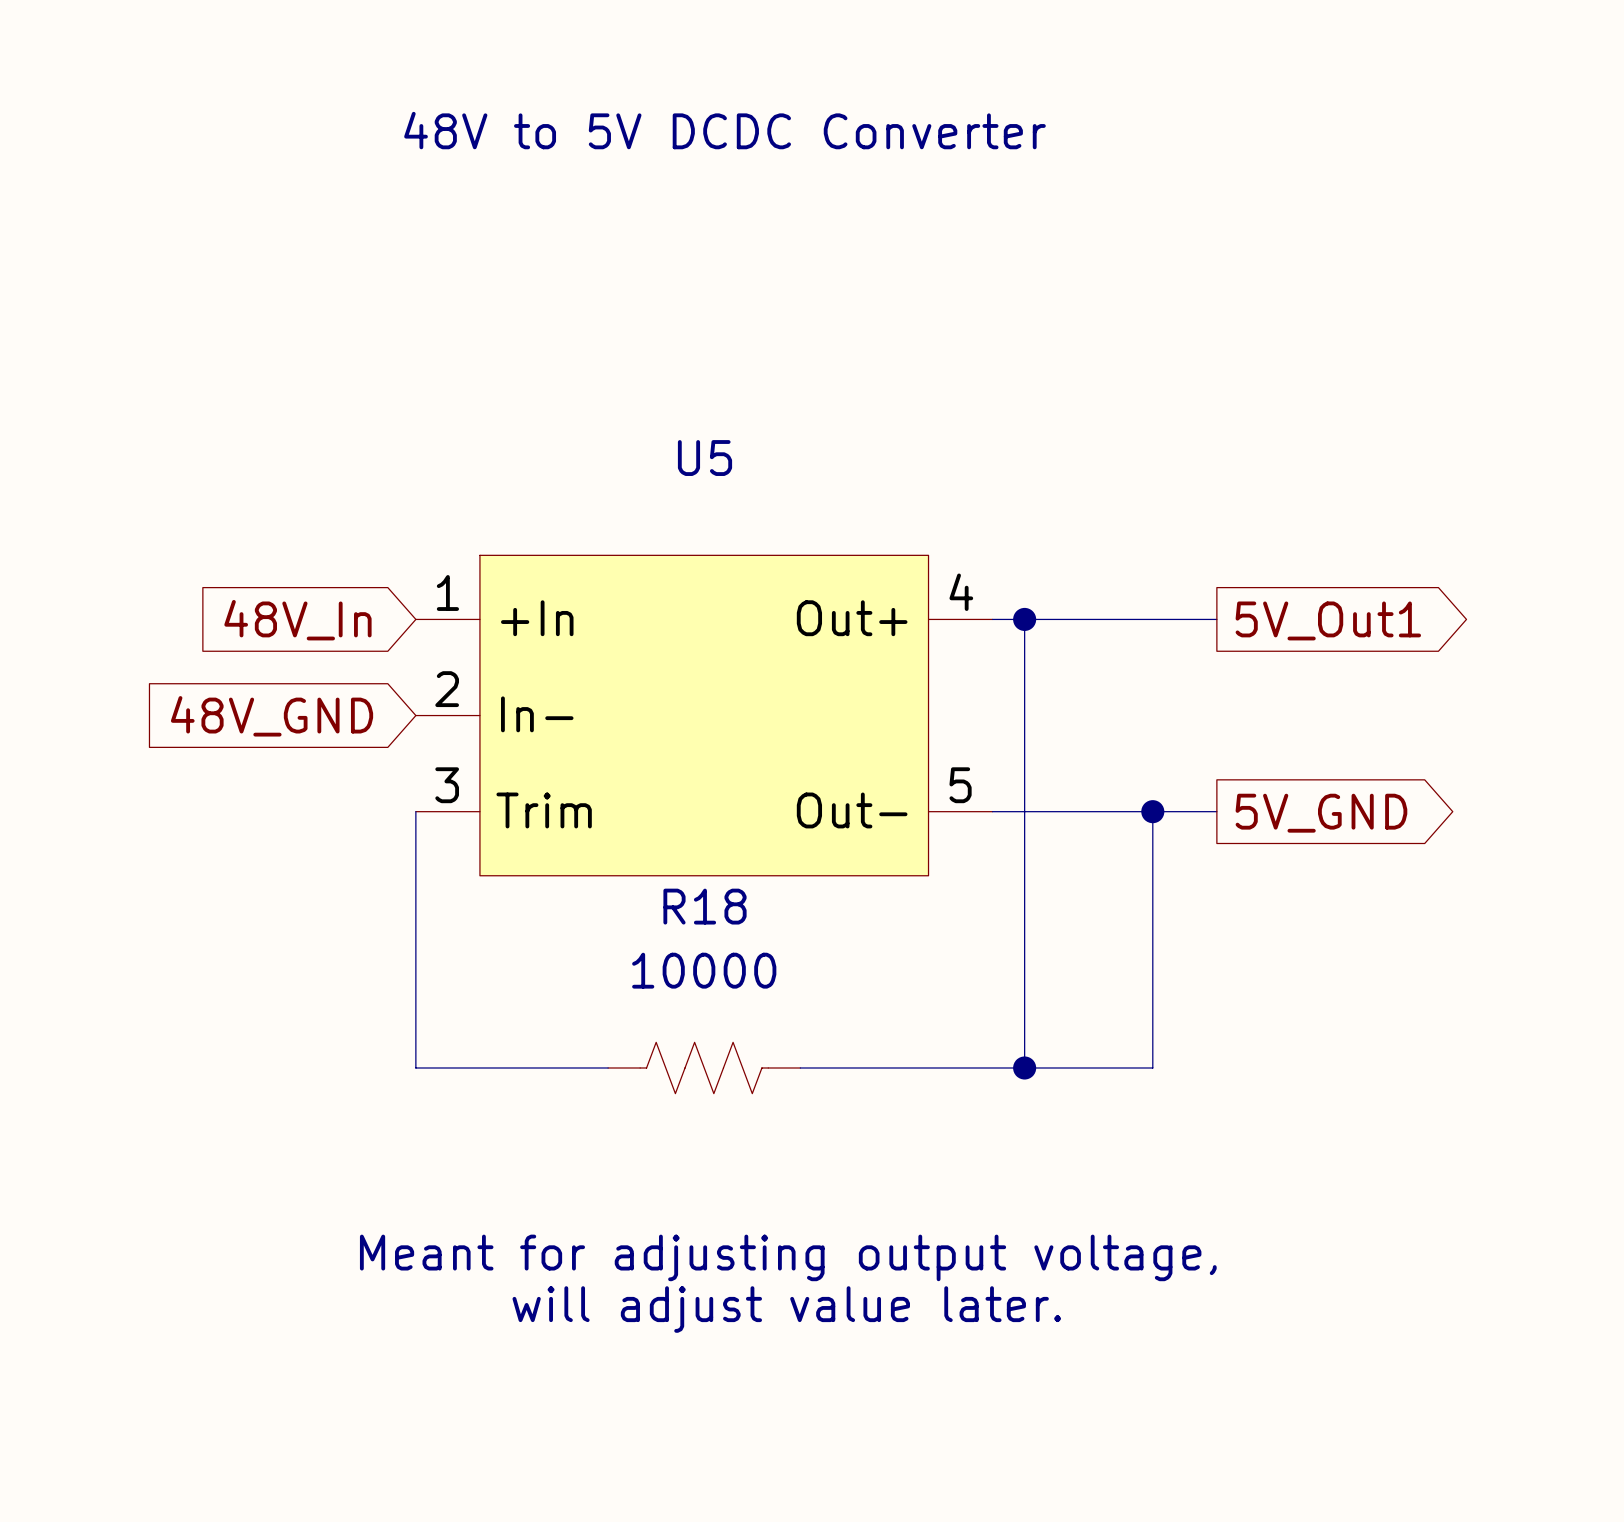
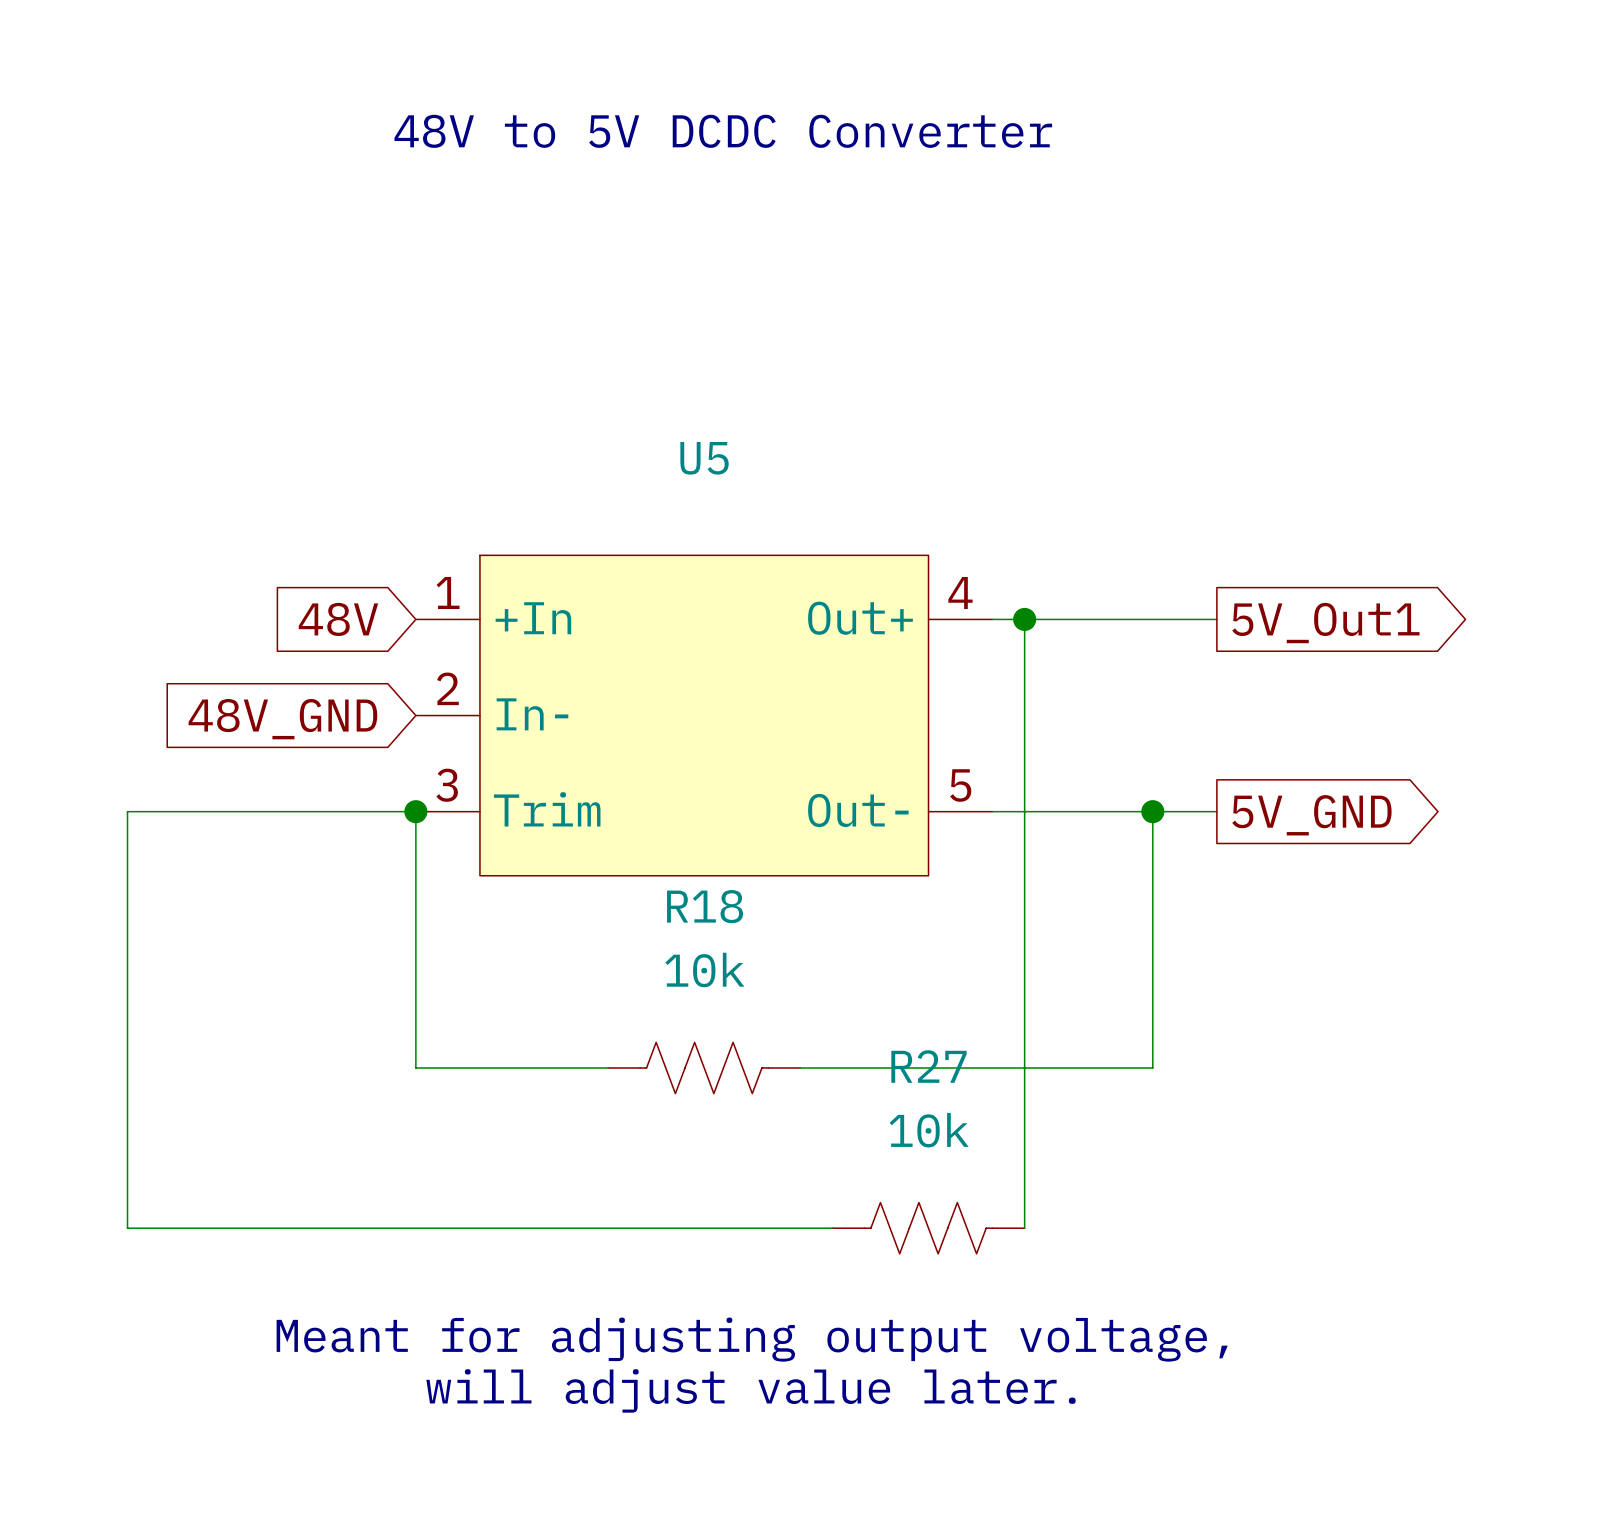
global label: 48V_In (297, 620) -> 48V (338, 619)
wire: none -> (415, 811) (127, 811) (127, 1228) (832, 1228)
junction: none -> (415, 811)
R18 value: 10000 (704, 970) -> 10k (704, 969)
wire: none -> (1024, 1067) (1024, 1228)
junction: (1024, 1067) -> none
R27: none -> 10k (928, 1228)
text position: Meant for adjusting output voltage, (788, 1257) -> Meant for adjusting output voltage, (752, 1339)
text position: will adjust value later. (786, 1309) -> will adjust value later. (751, 1390)

